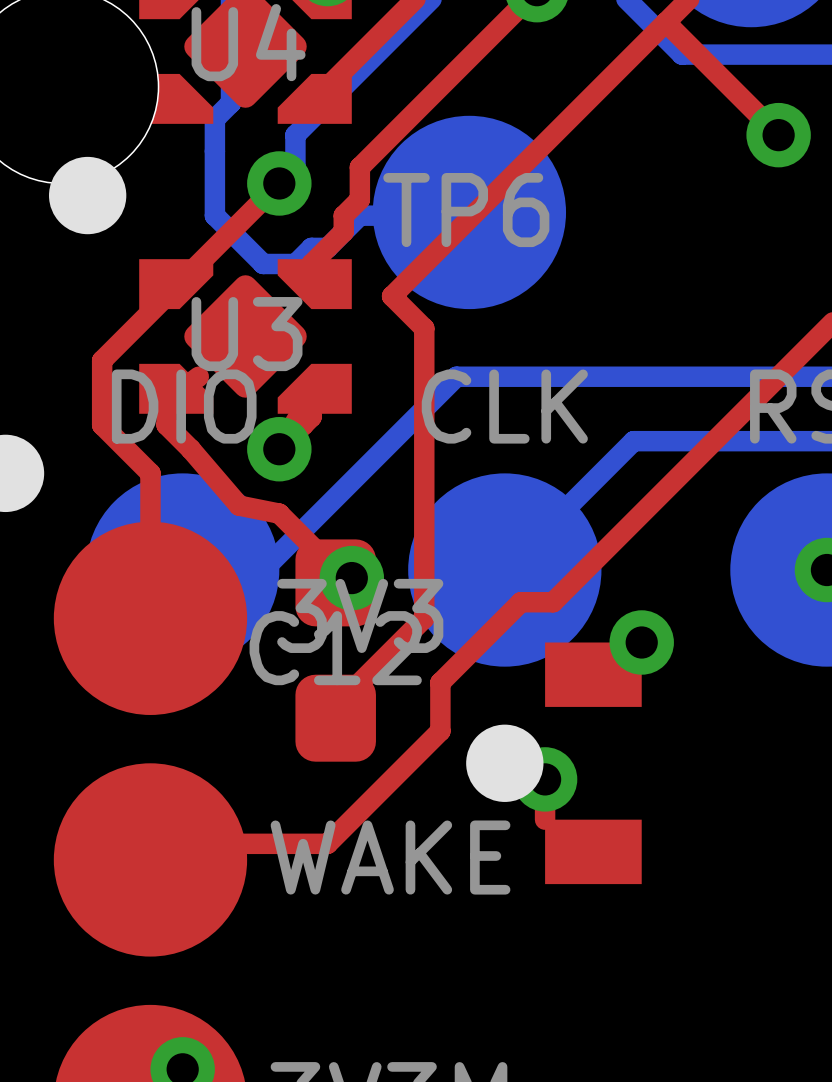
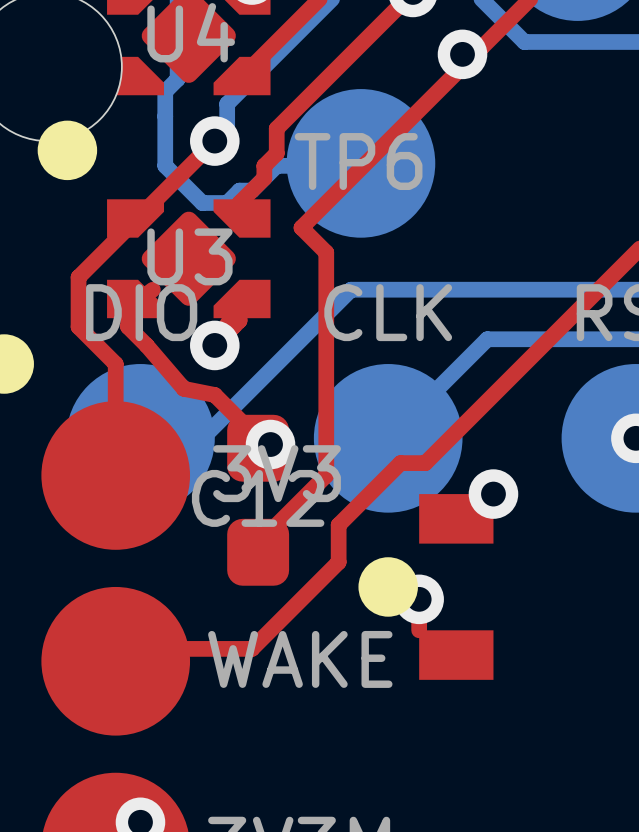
top track: (665, 22) (778, 135) -> none
via: none -> (462, 54)
via: (778, 135) -> none

